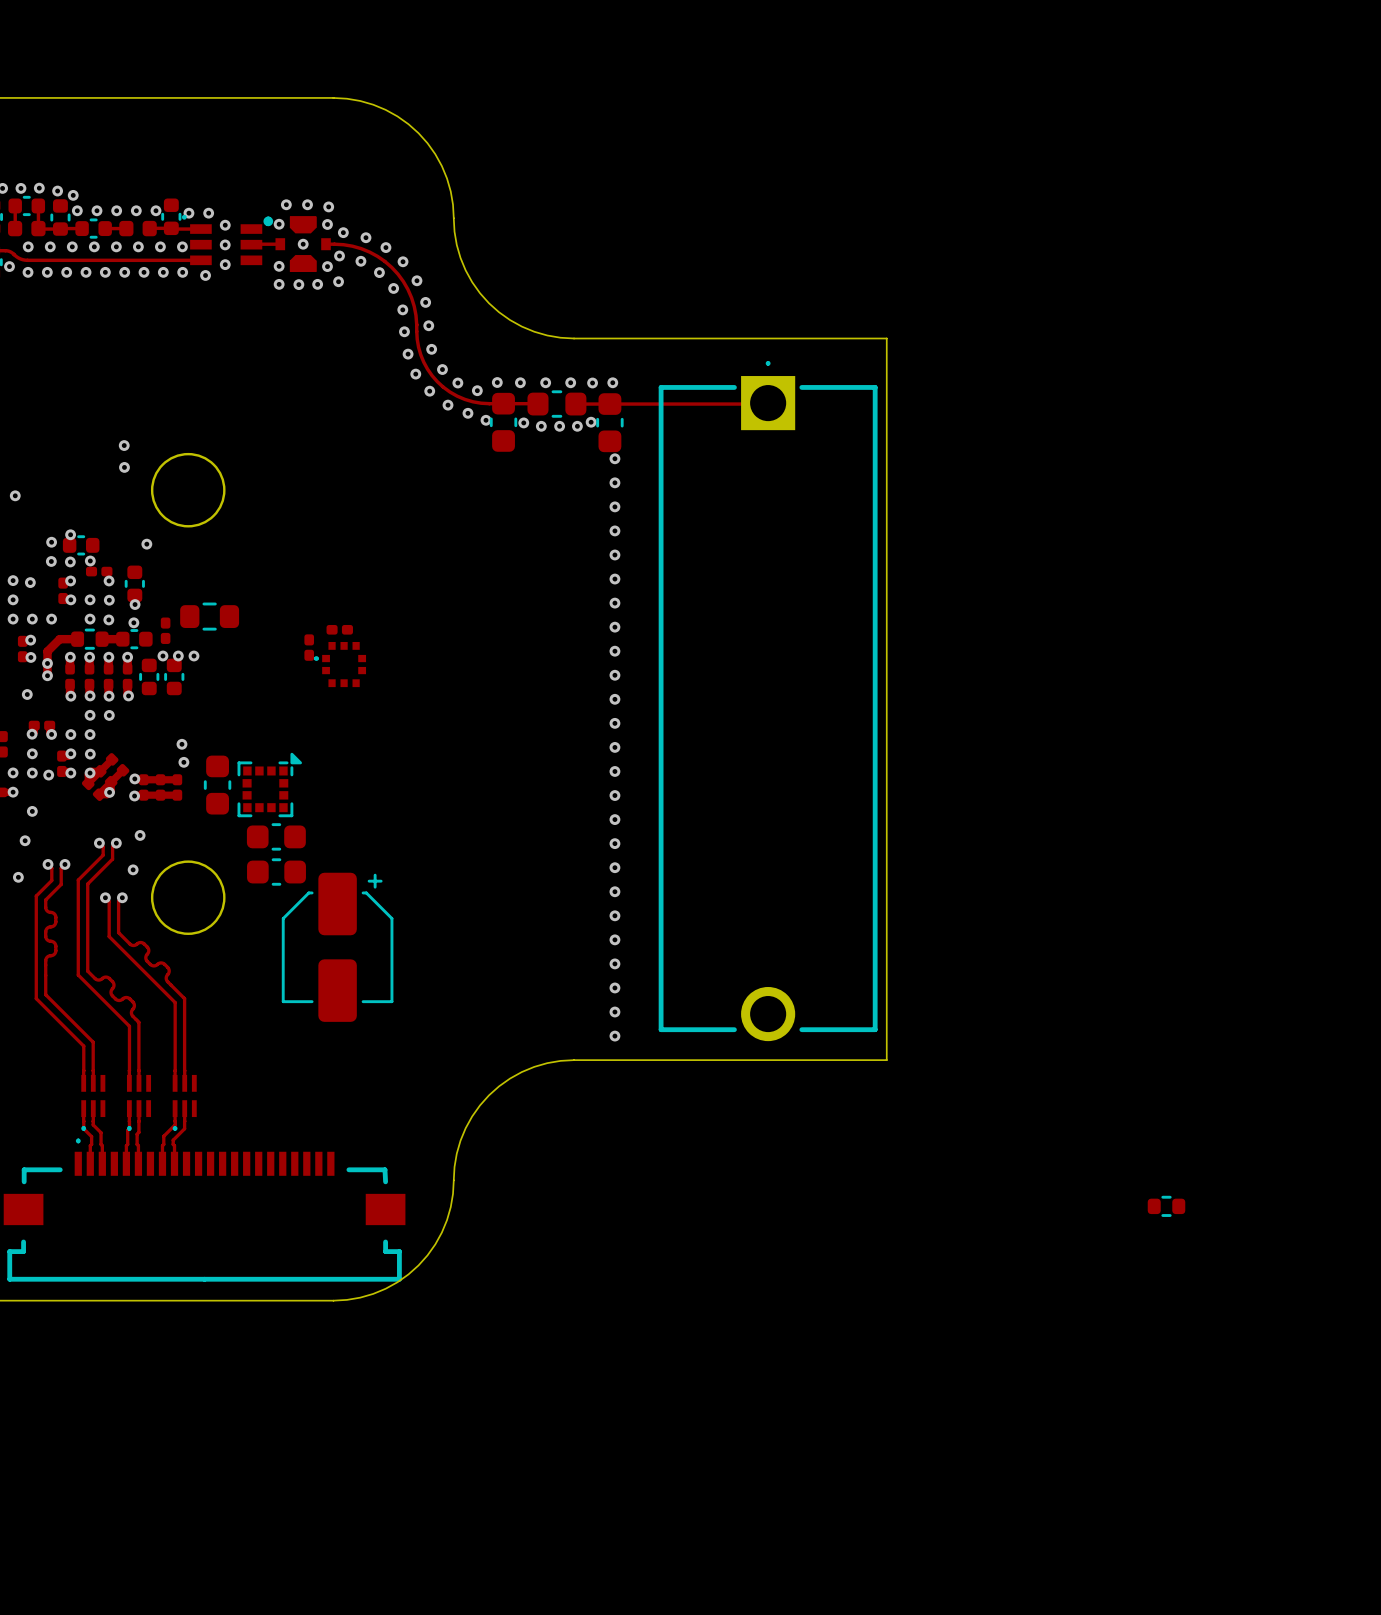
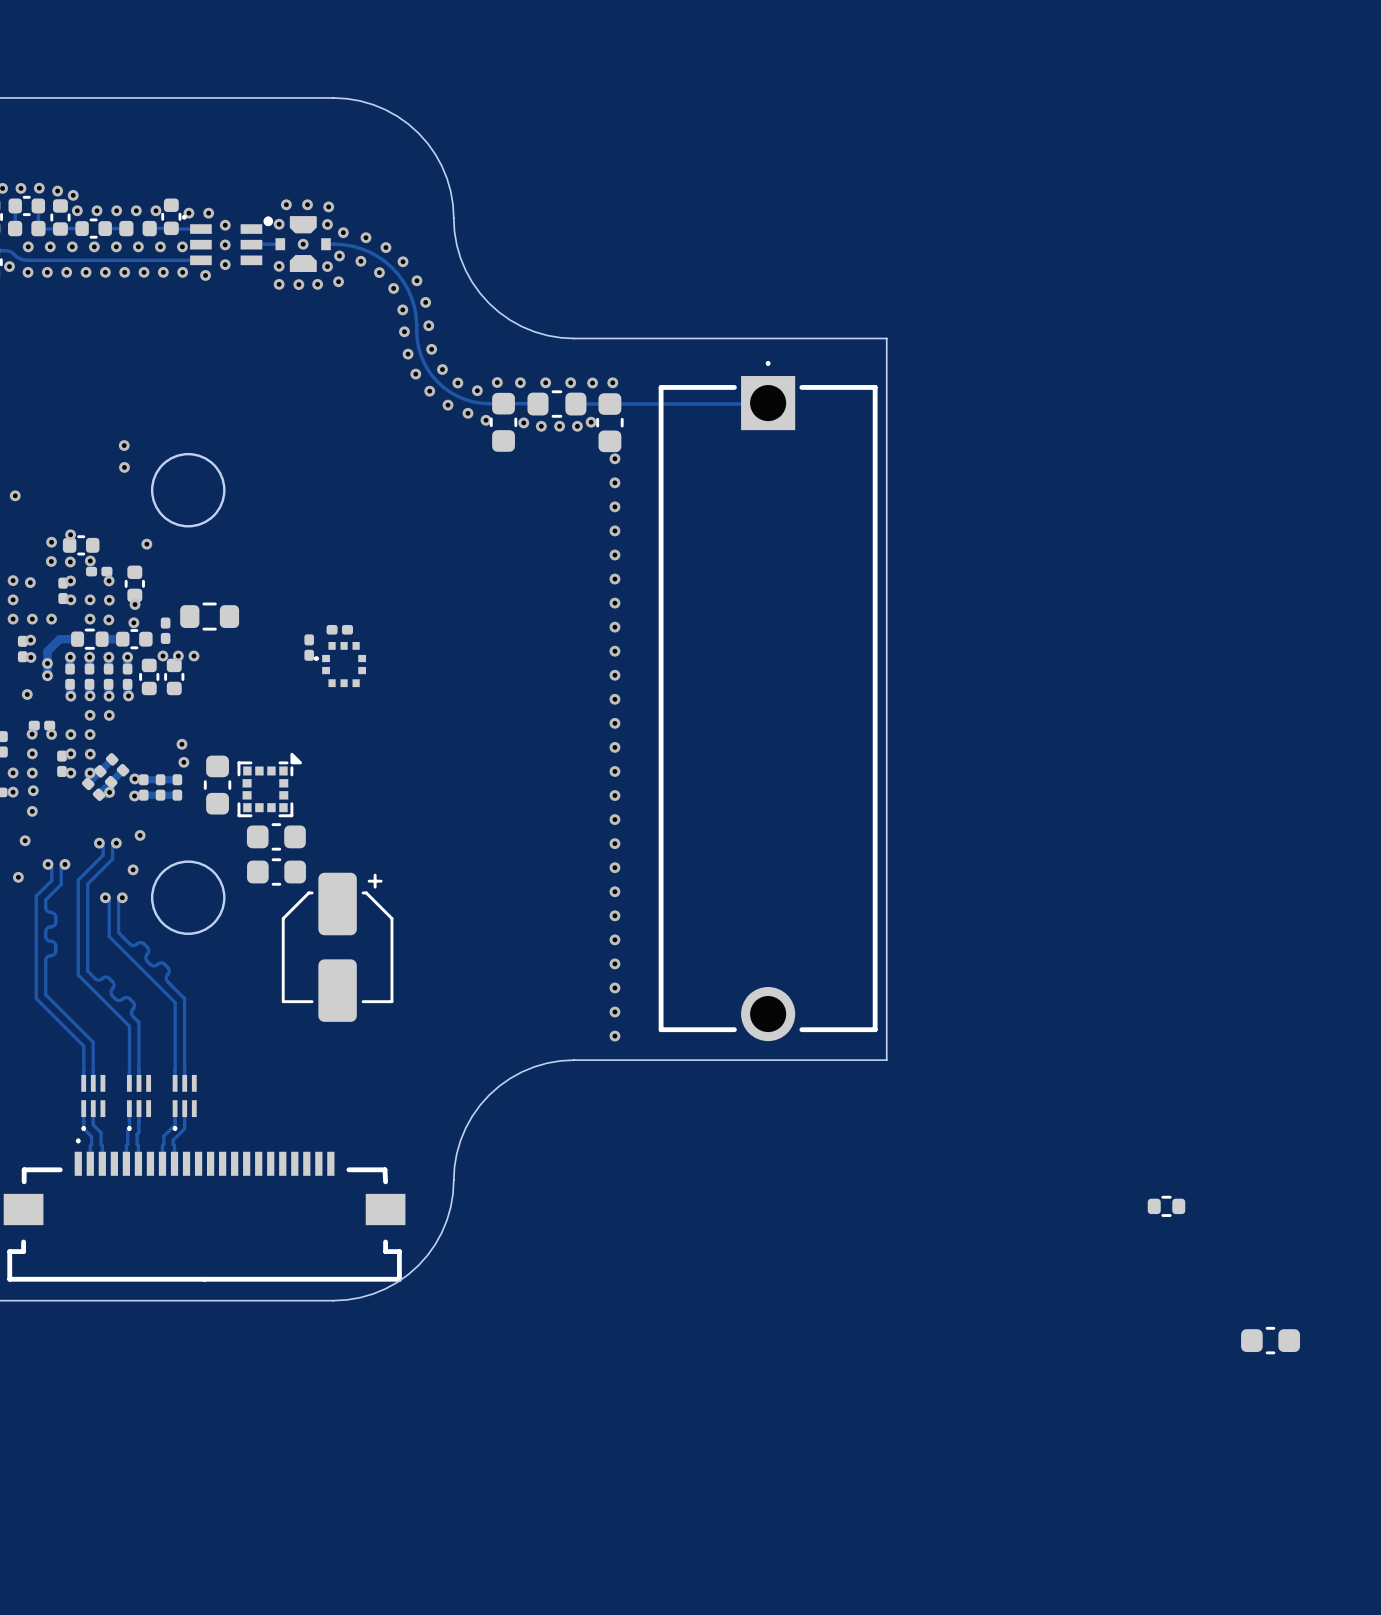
via: (48, 775) -> none
via: none -> (33, 790)
part: none -> (1270, 1340)

